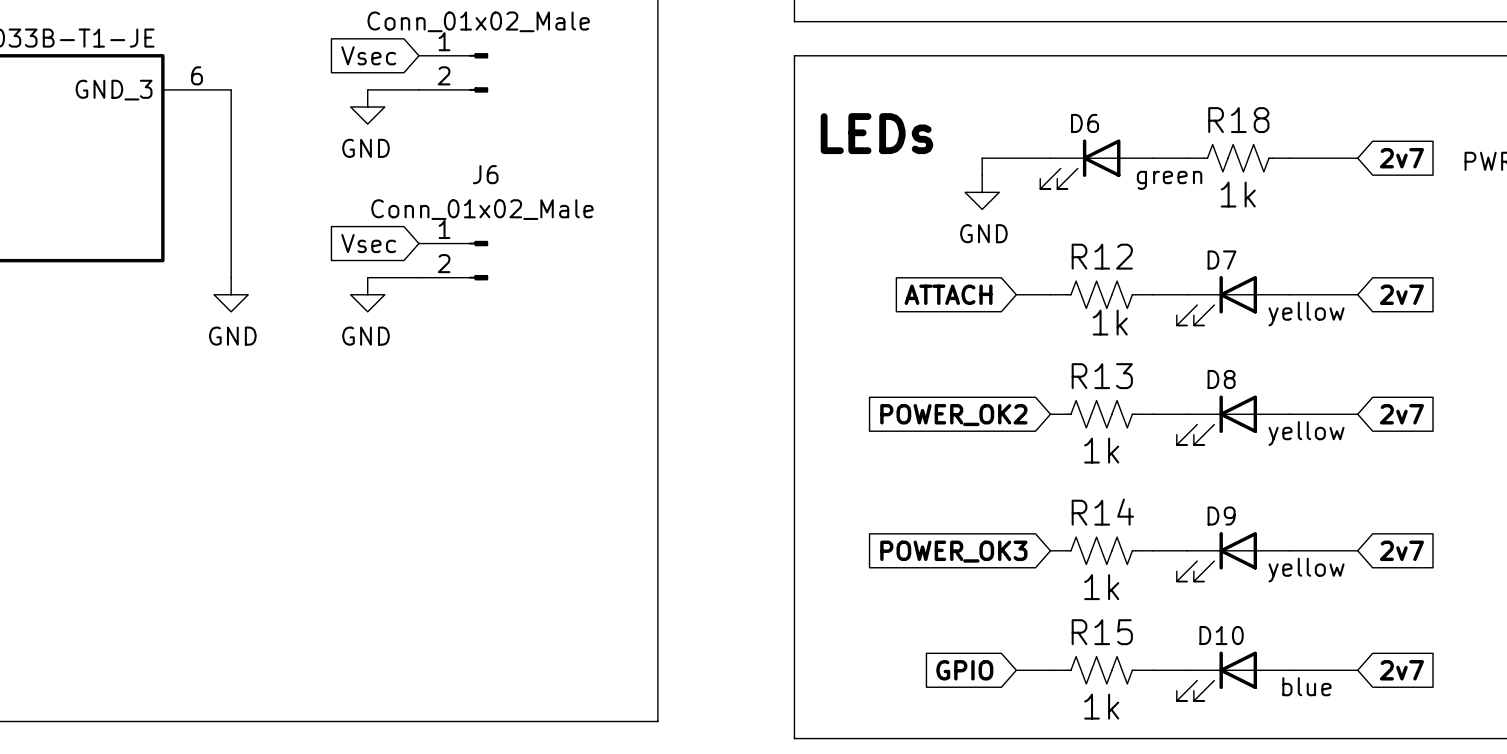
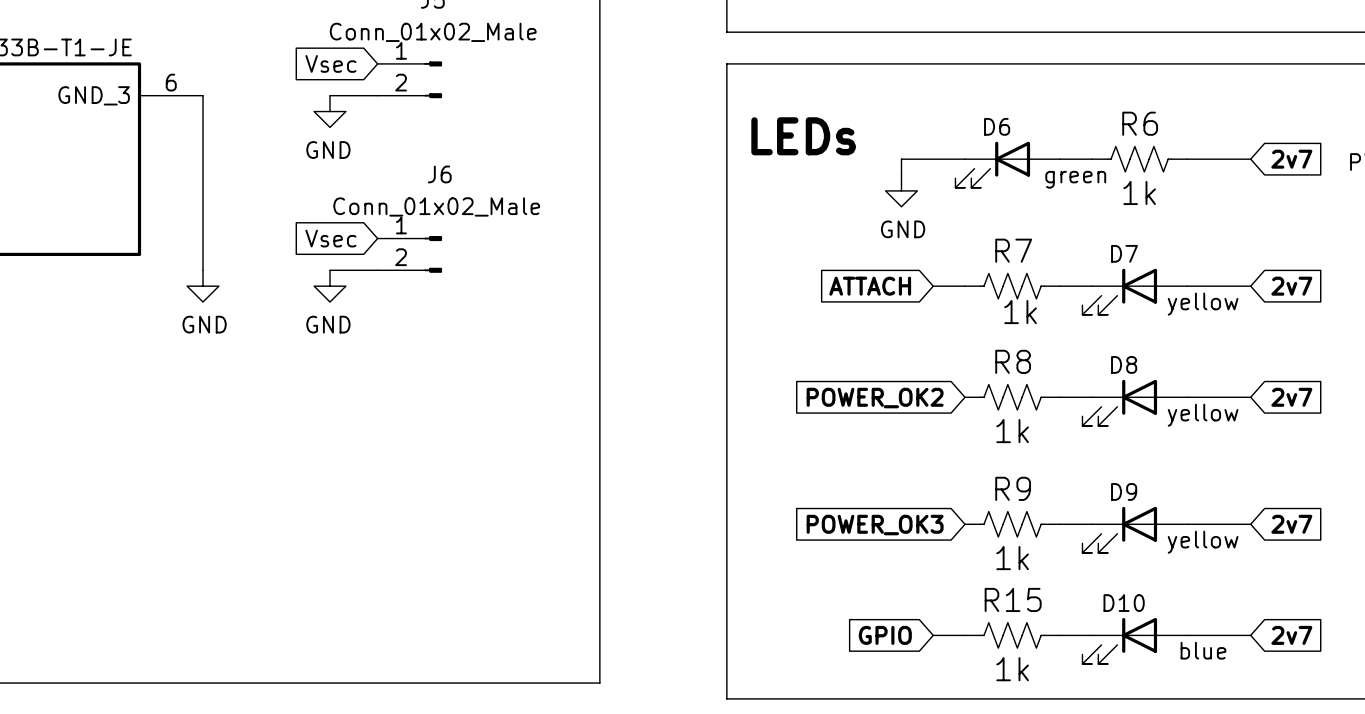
R18 name: R18 (1238, 120) -> R6 (1140, 123)
R12 name: R12 (1102, 256) -> R7 (1013, 250)
R13 name: R13 (1102, 376) -> R8 (1013, 361)
R14 name: R14 (1102, 512) -> R9 (1013, 488)

